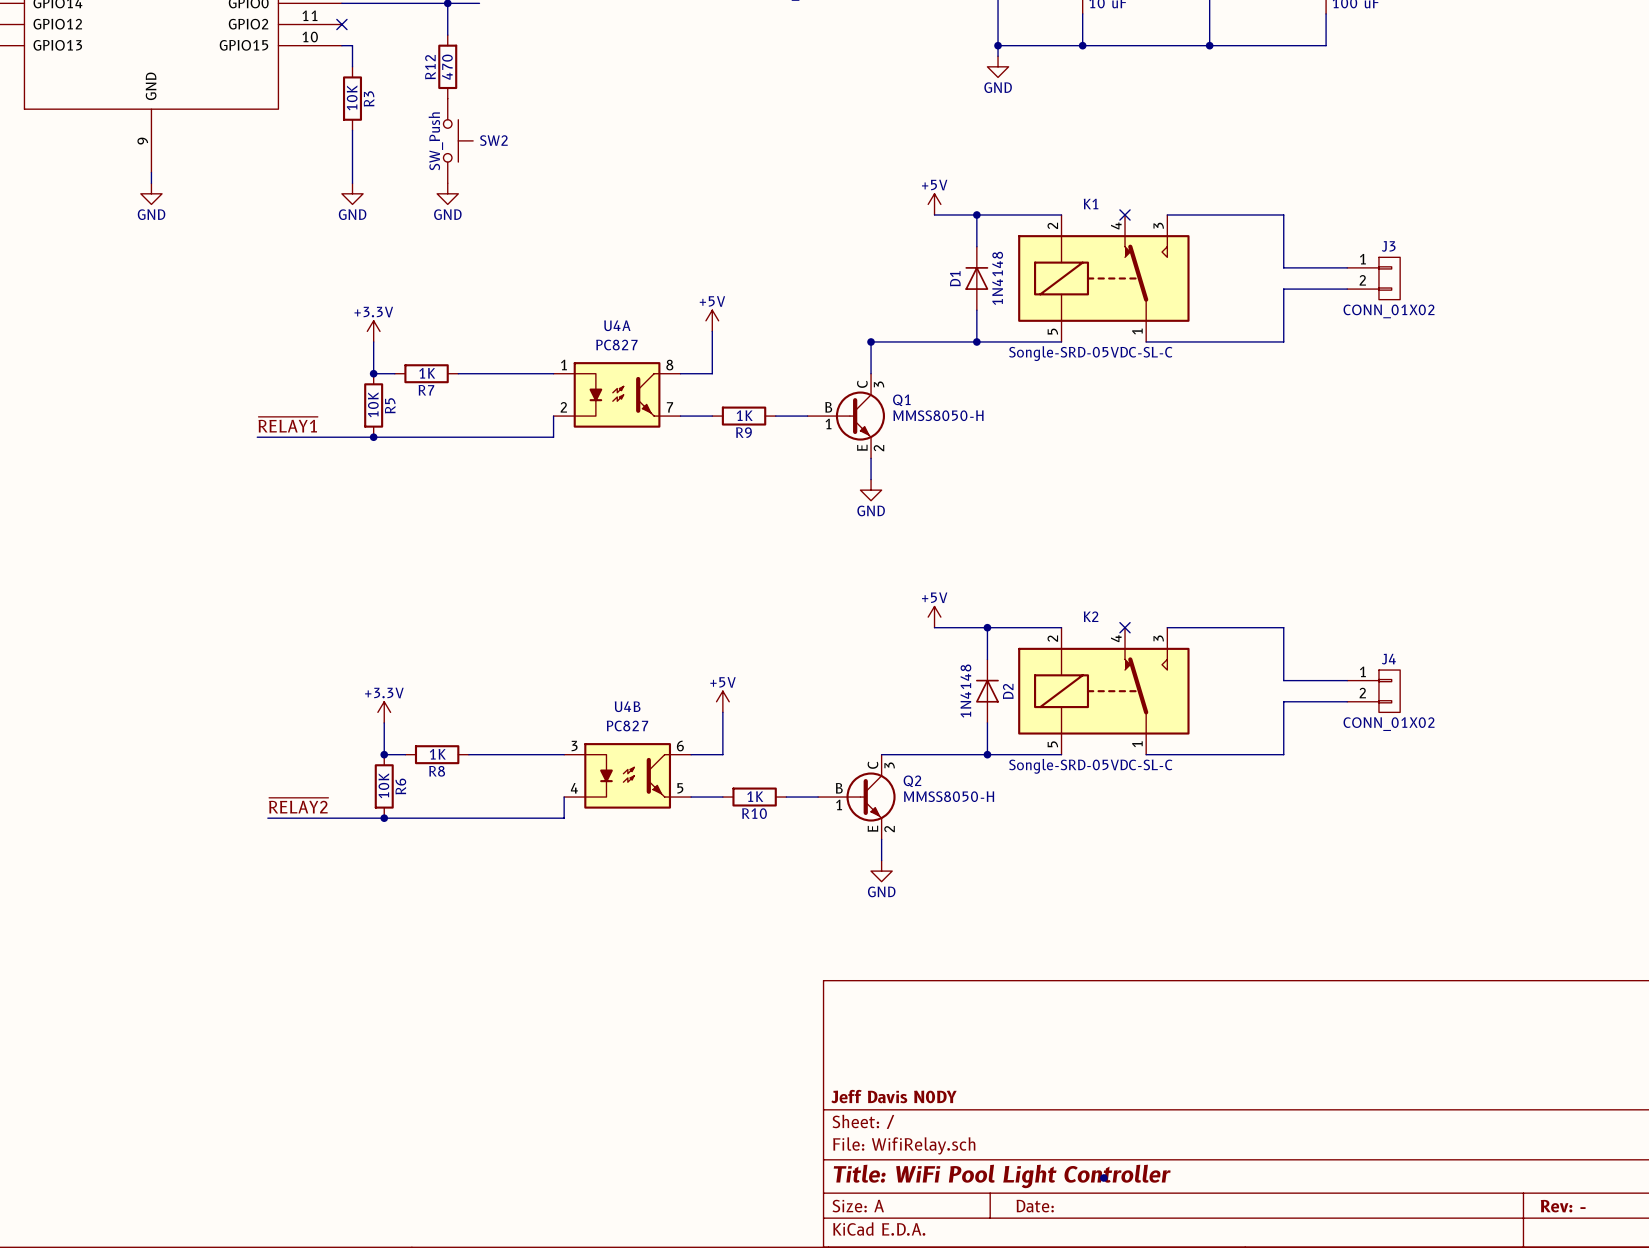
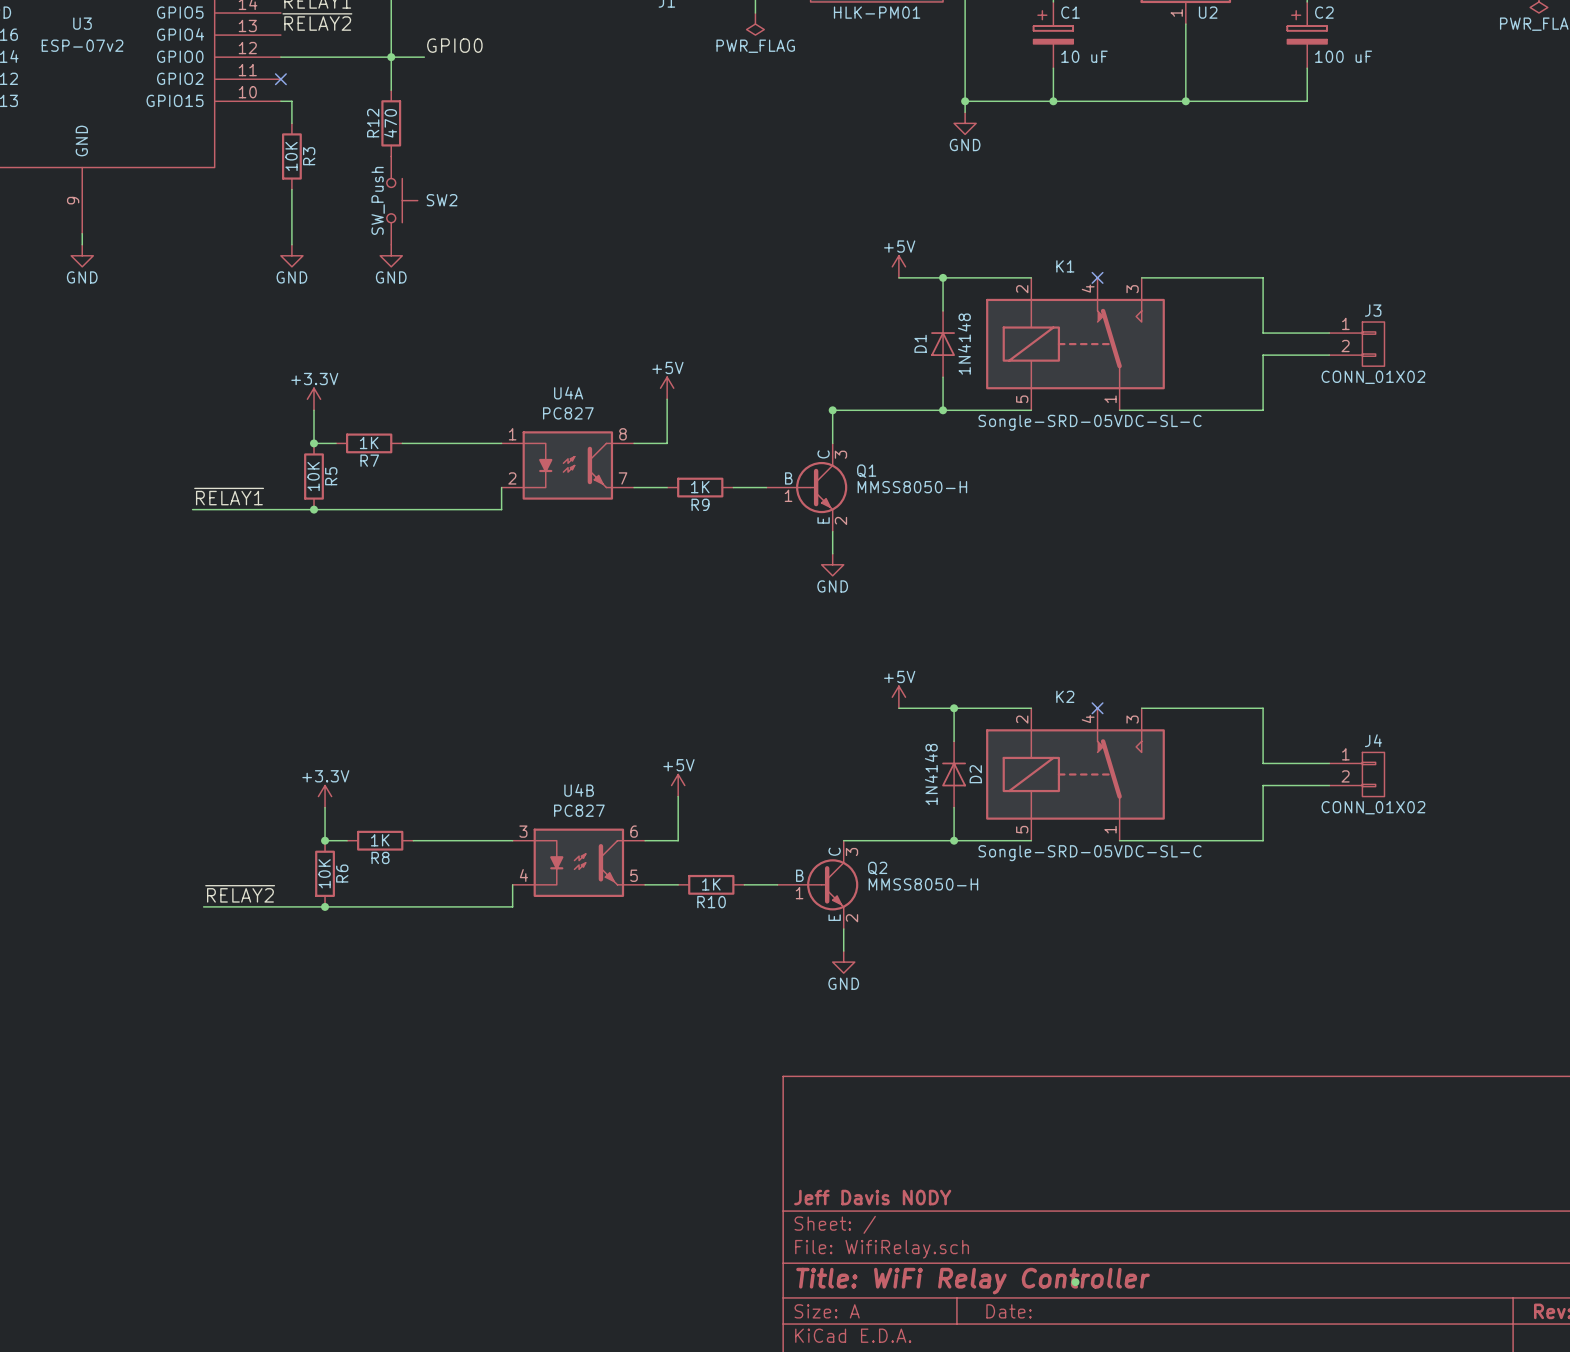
title block: Title: WiFi Pool Light Controller (1002, 1176) -> Title: WiFi Relay Controller (973, 1281)

